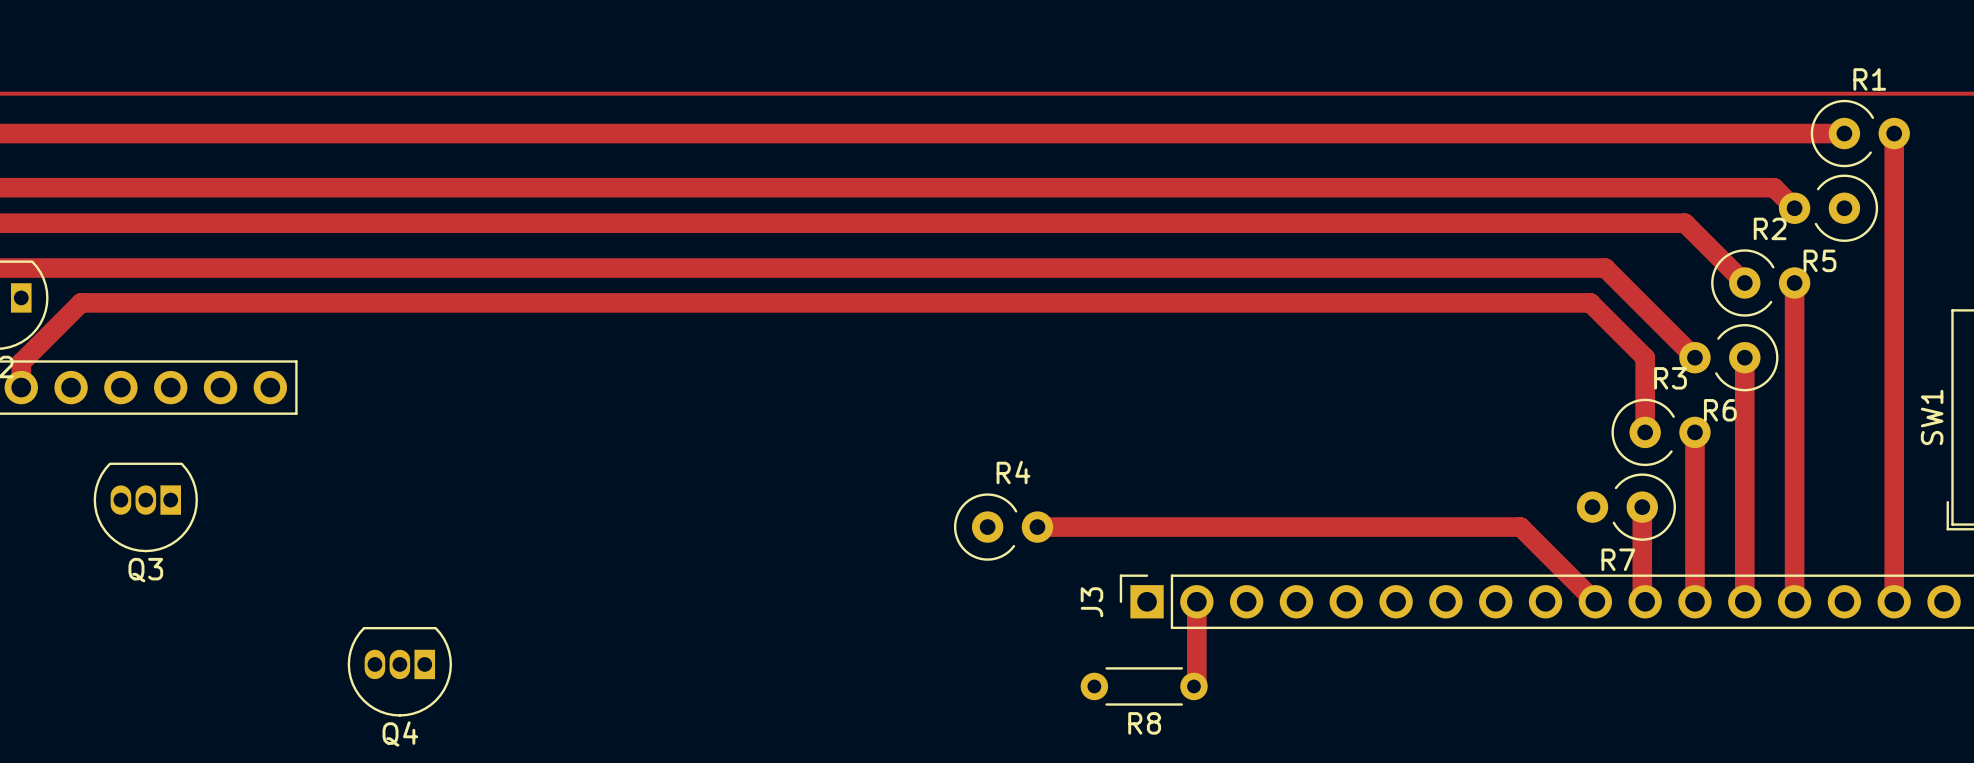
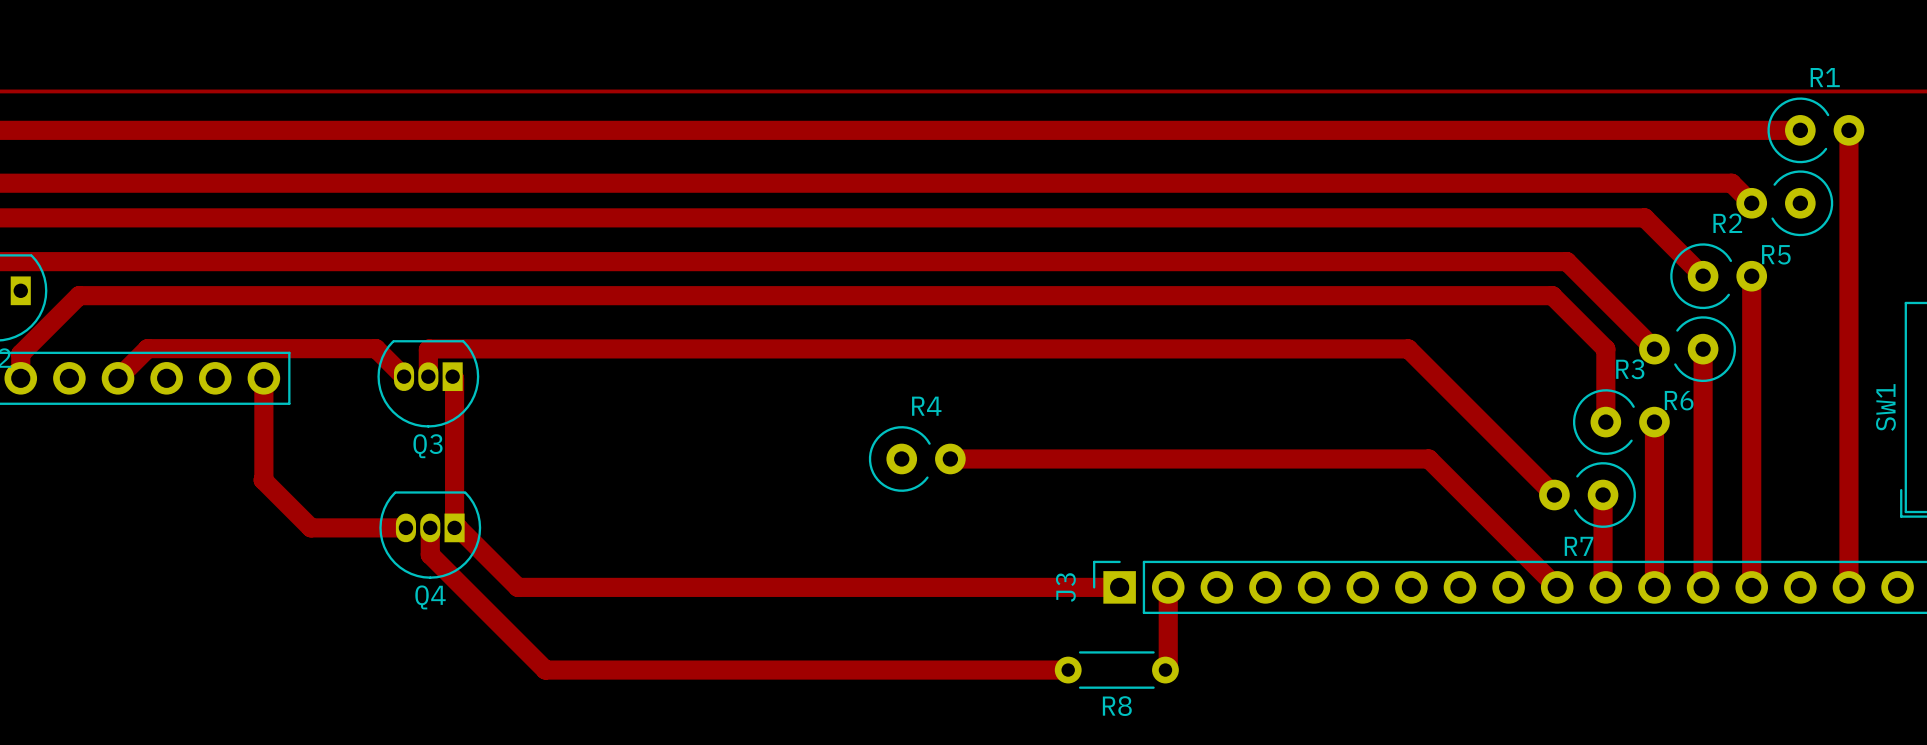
track: none -> (404, 376) (376, 348) (147, 348) (118, 378)
track: none -> (428, 376) (429, 348) (1408, 348) (1554, 495)
track: none -> (452, 376) (454, 378) (454, 527) (458, 527) (517, 587) (1119, 587)
track: none -> (263, 378) (263, 480) (311, 527) (405, 527)
Q3 position: (145, 507) -> (428, 383)
R4 position: (1003, 527) -> (917, 458)
track: (1037, 527) (1520, 527) -> (950, 458) (1428, 458) (1484, 514)
track: none -> (430, 527) (430, 554) (545, 670) (1068, 670)
Q4 position: (399, 671) -> (430, 535)

